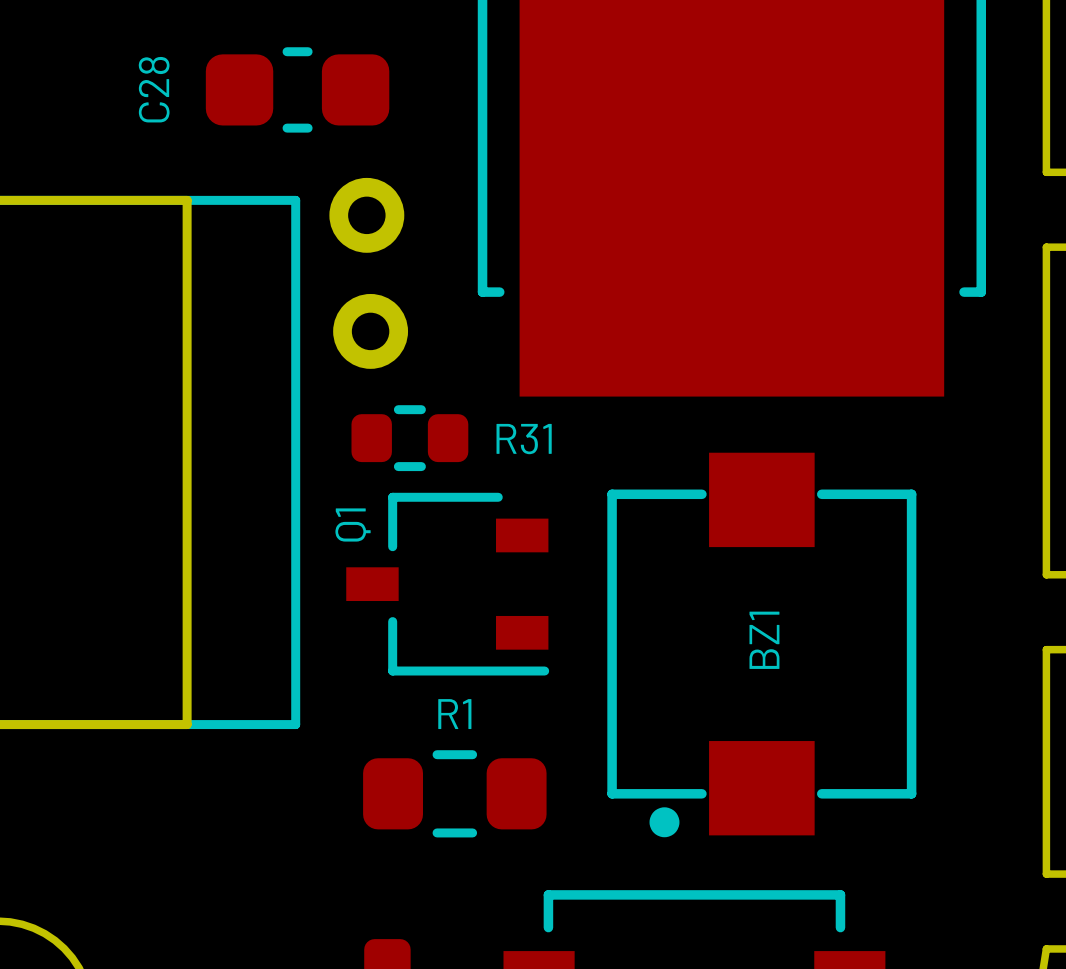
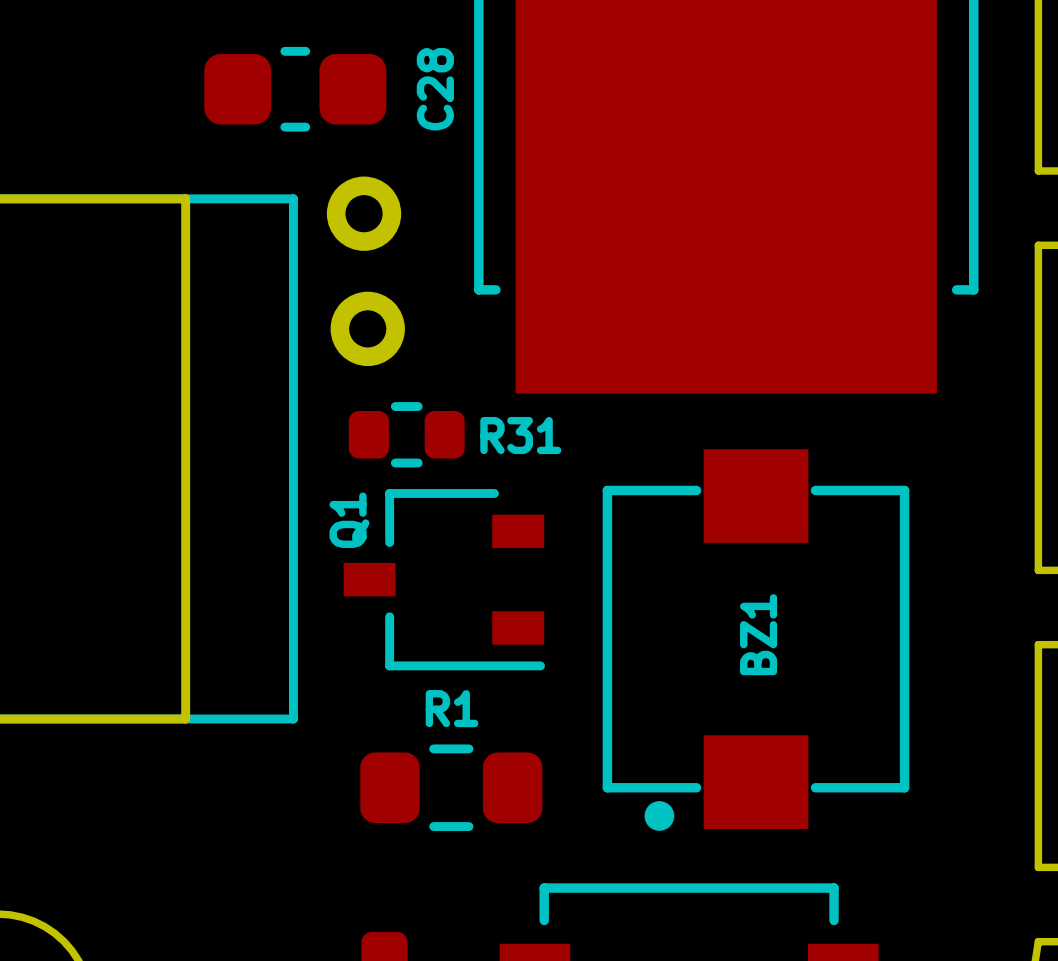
C28 name position: C28 (154, 89) -> C28 (435, 89)

